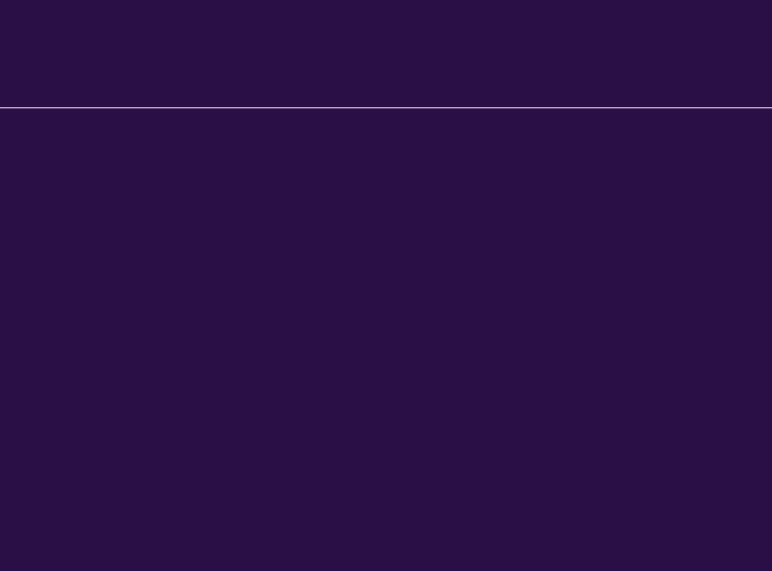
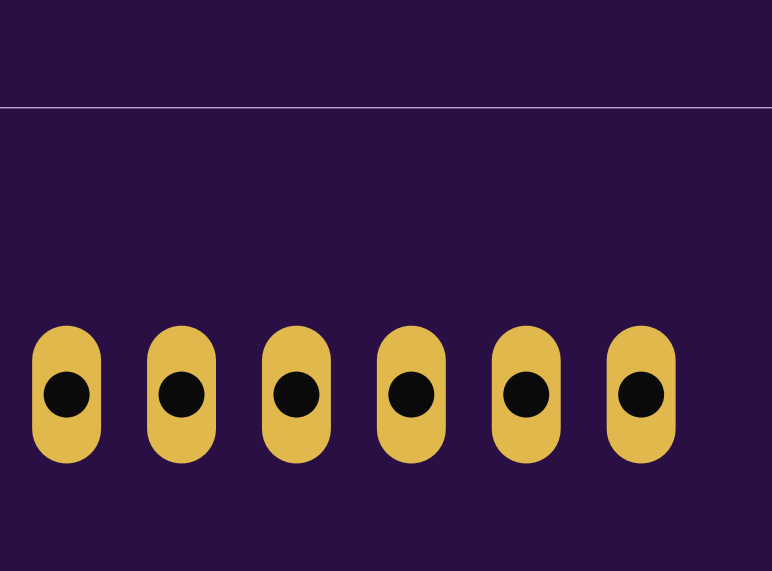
part: none -> (353, 394)

